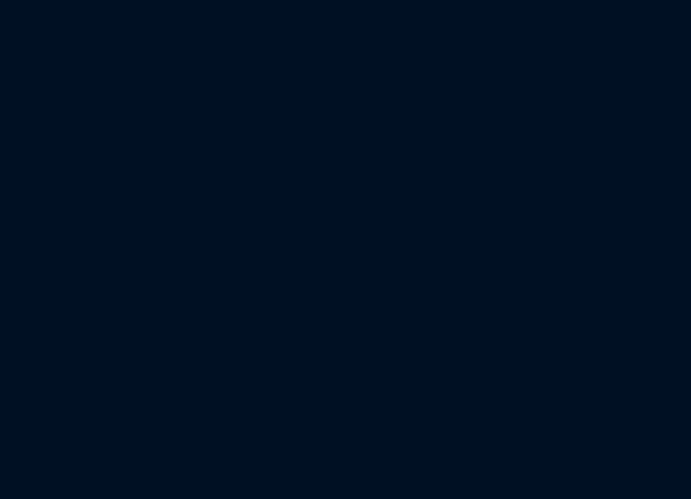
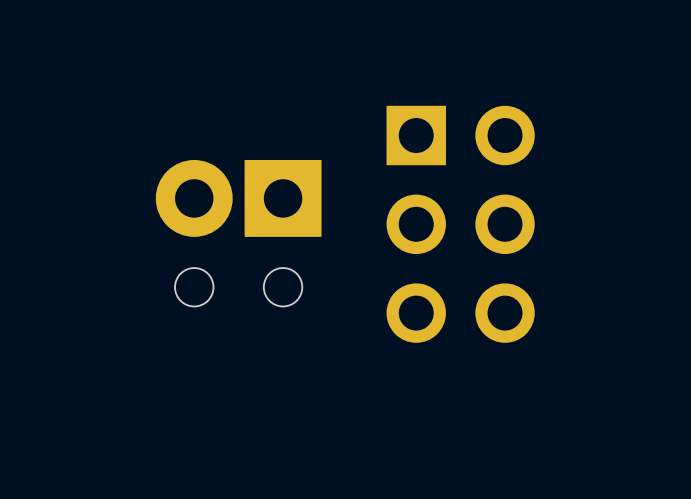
part: none -> (460, 224)
part: none -> (238, 233)

